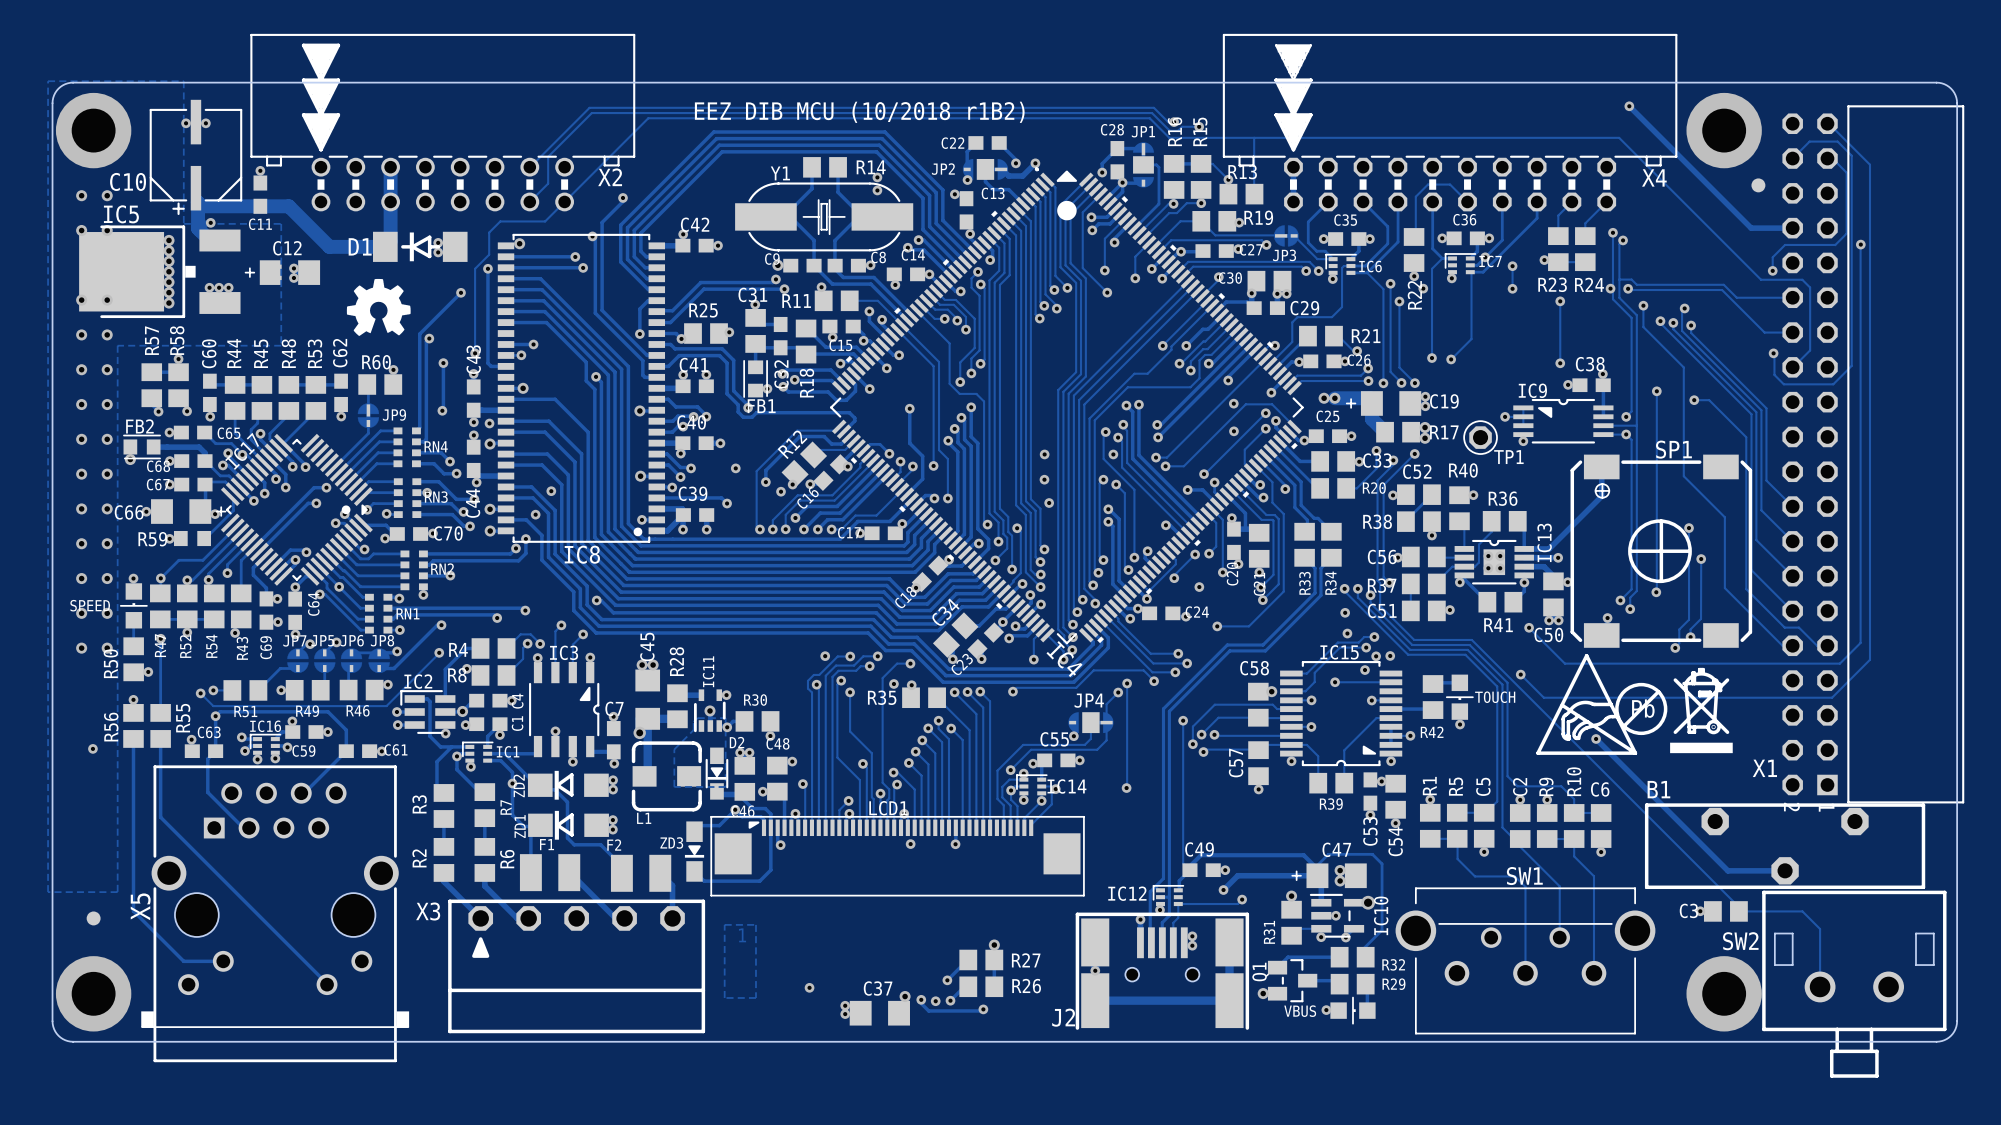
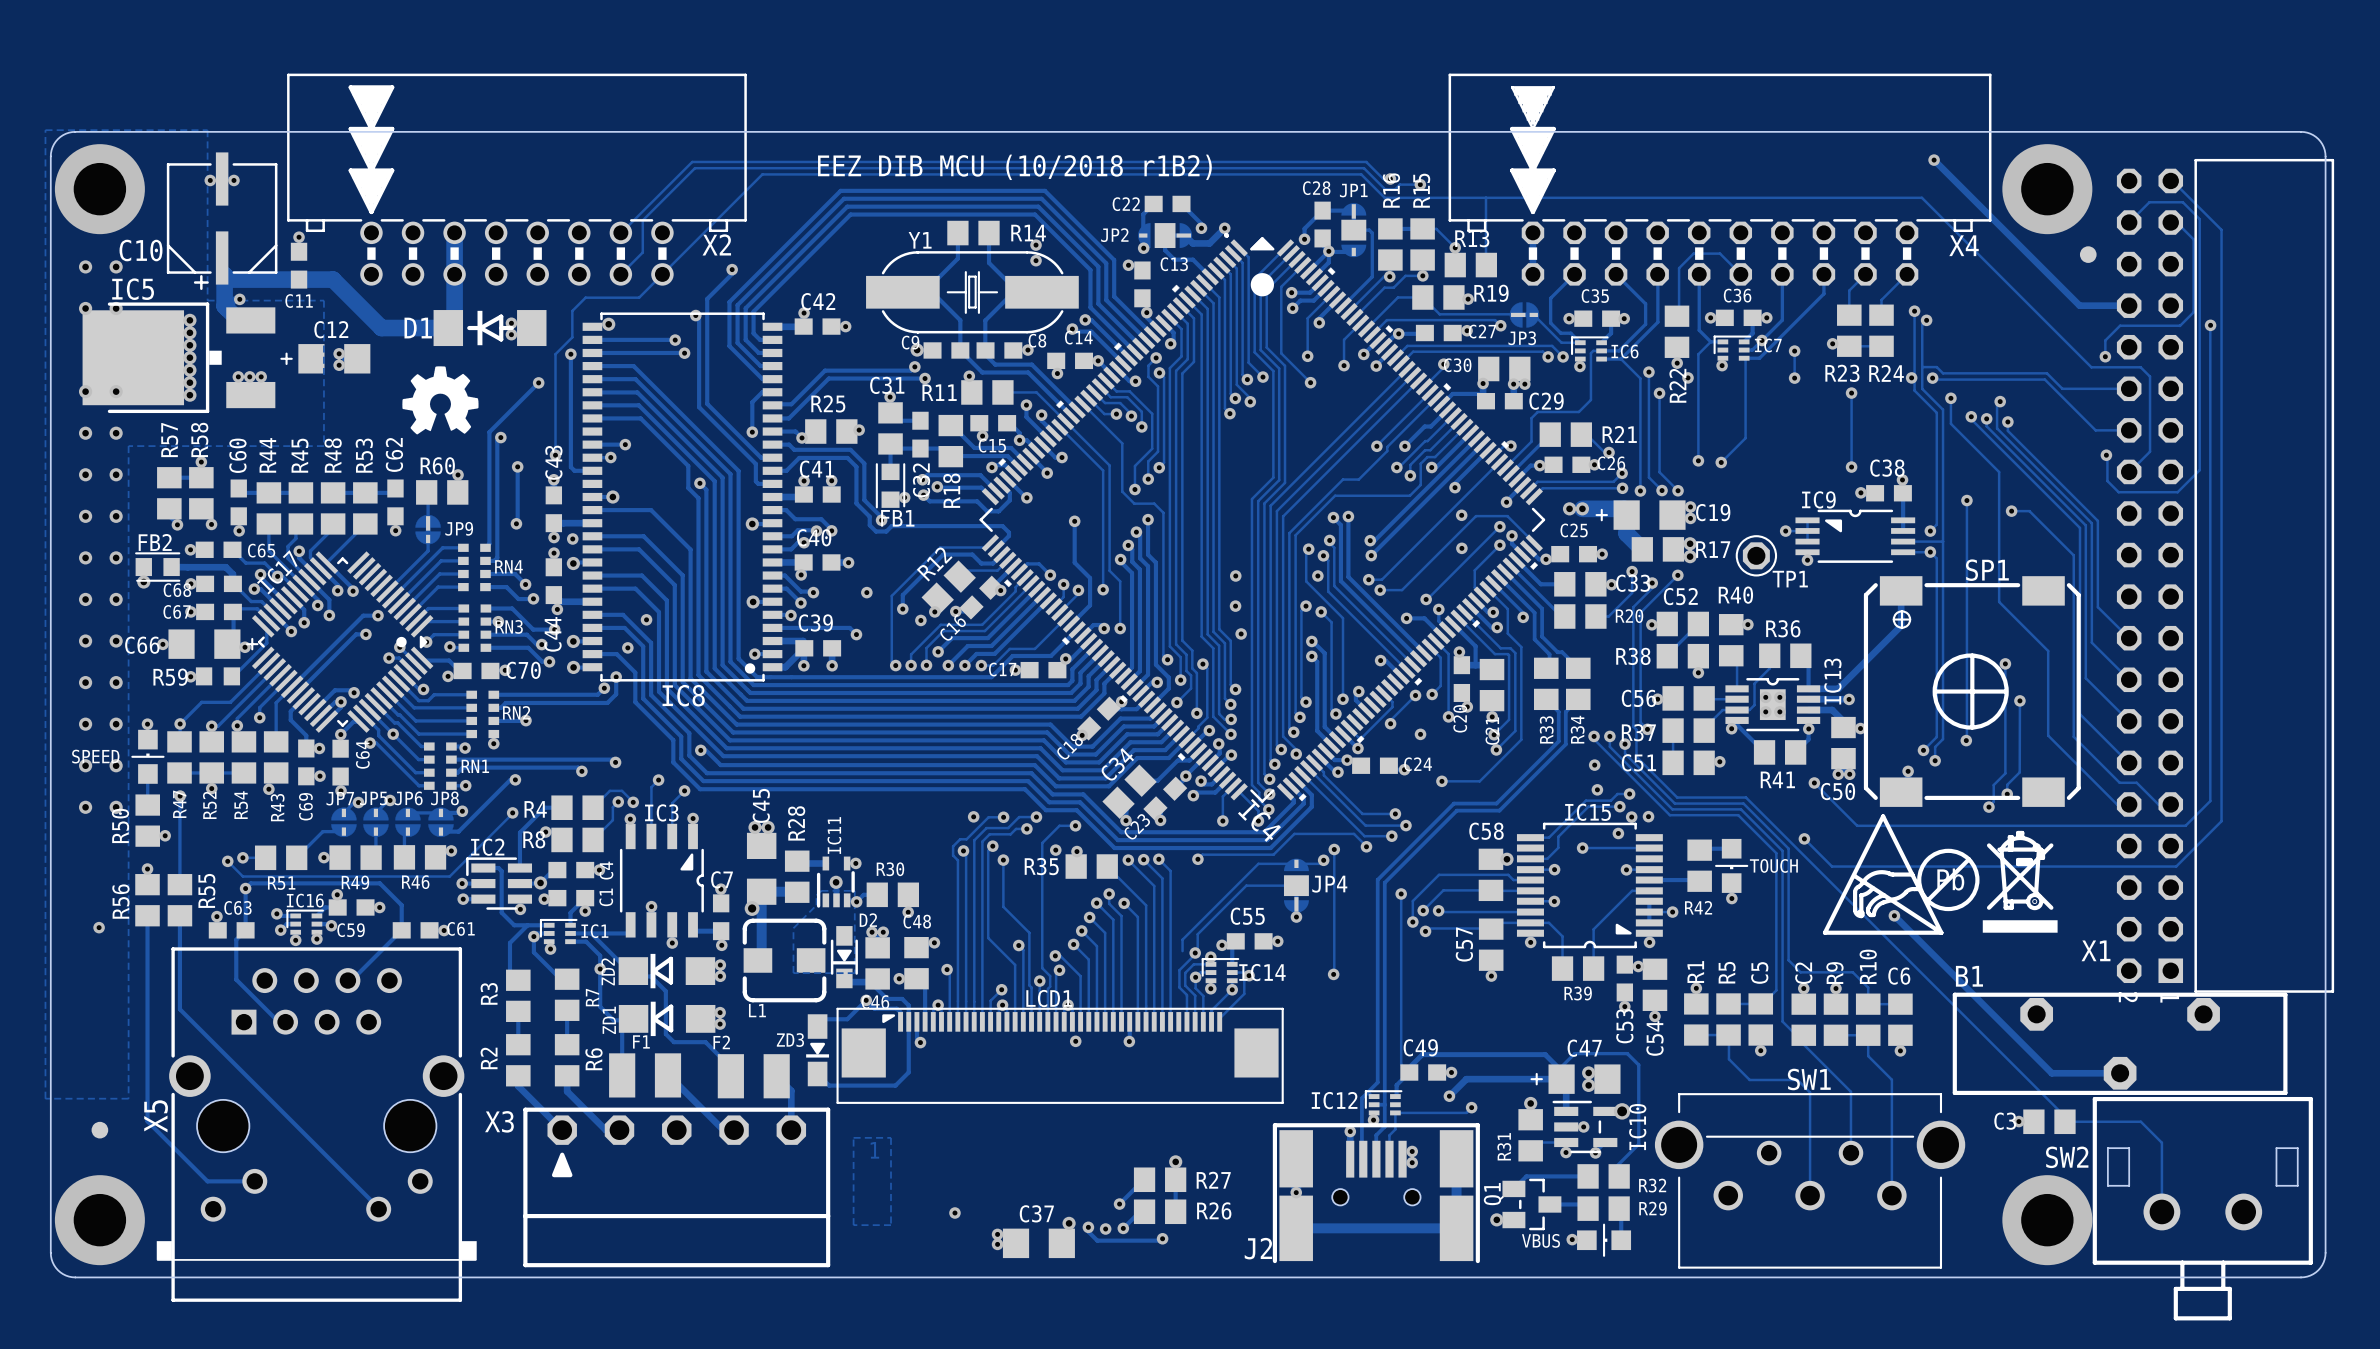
track: (1115, 695) (1106, 704) (1106, 740) (1097, 749) (1031, 749) (1010, 770) -> (1320, 863) (1258, 863) (1182, 939) (1182, 951)
track: (1090, 722) (1090, 738) (1084, 744) (1023, 744) (997, 770) (997, 784) -> (1296, 885) (1246, 885) (1197, 934) (1197, 951) (1179, 970)
JP4 rotation: 0° (1090, 722) -> 90° clockwise (1296, 885)
via position: (1073, 736) -> (1296, 917)

